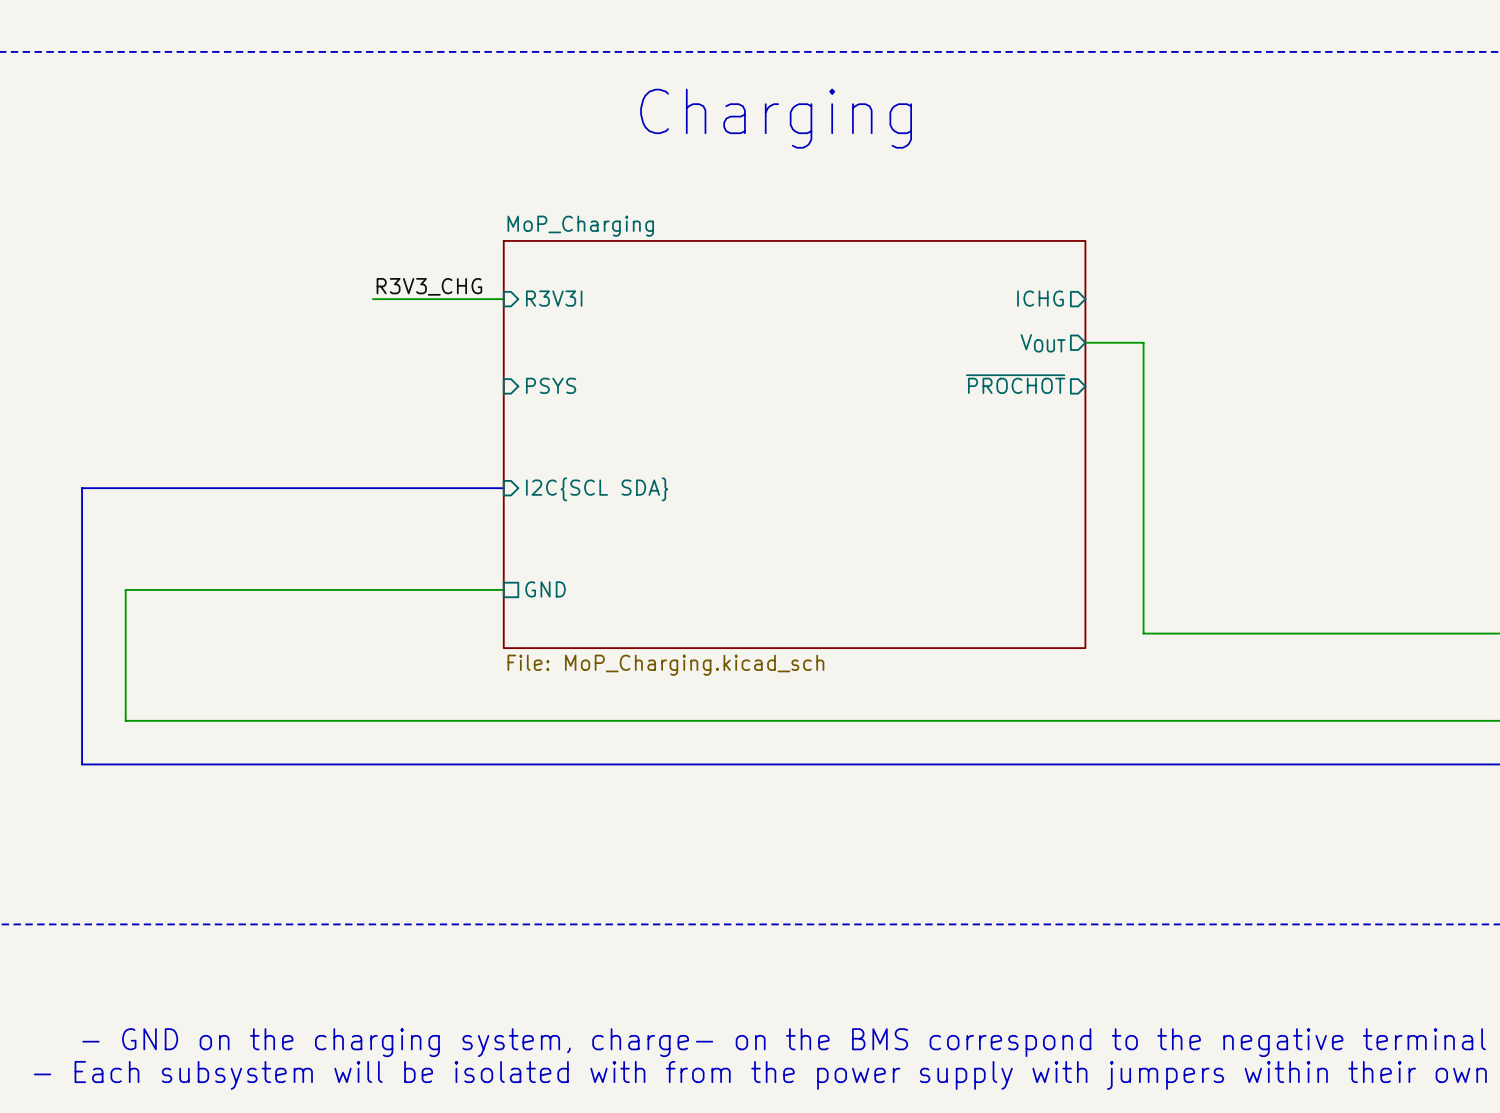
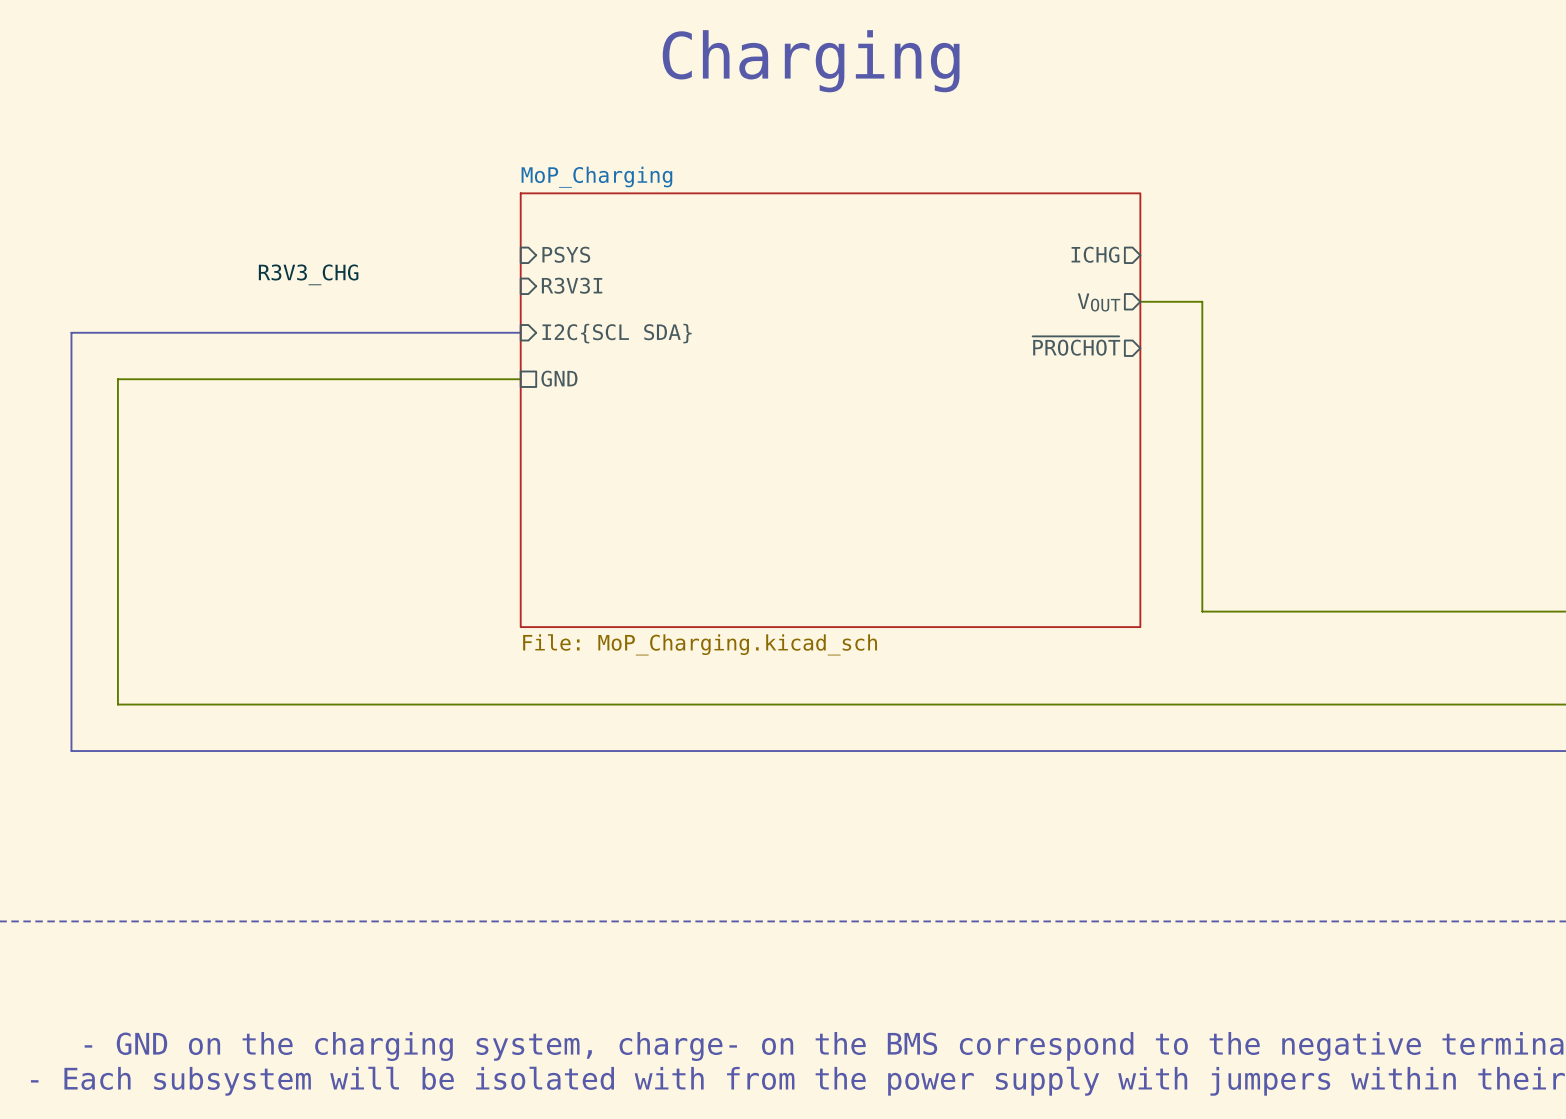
label position: R3V3_CHG (429, 286) -> R3V3_CHG (308, 274)
sheet pin: R3V3I (554, 298) -> PSYS (566, 254)
wire: (372, 299) (503, 299) -> none
sheet pin: none -> R3V3I (572, 285)
sheet pin: PSYS (551, 385) -> none
bus: (82, 488) (503, 488) -> (71, 456) (71, 332) (520, 332)
sheet pin position: I2C{SCL SDA} (597, 489) -> I2C{SCL SDA} (617, 333)
wire: (125, 589) (503, 589) -> (117, 565) (117, 379) (520, 379)
sheet pin position: GND (545, 589) -> GND (559, 378)

